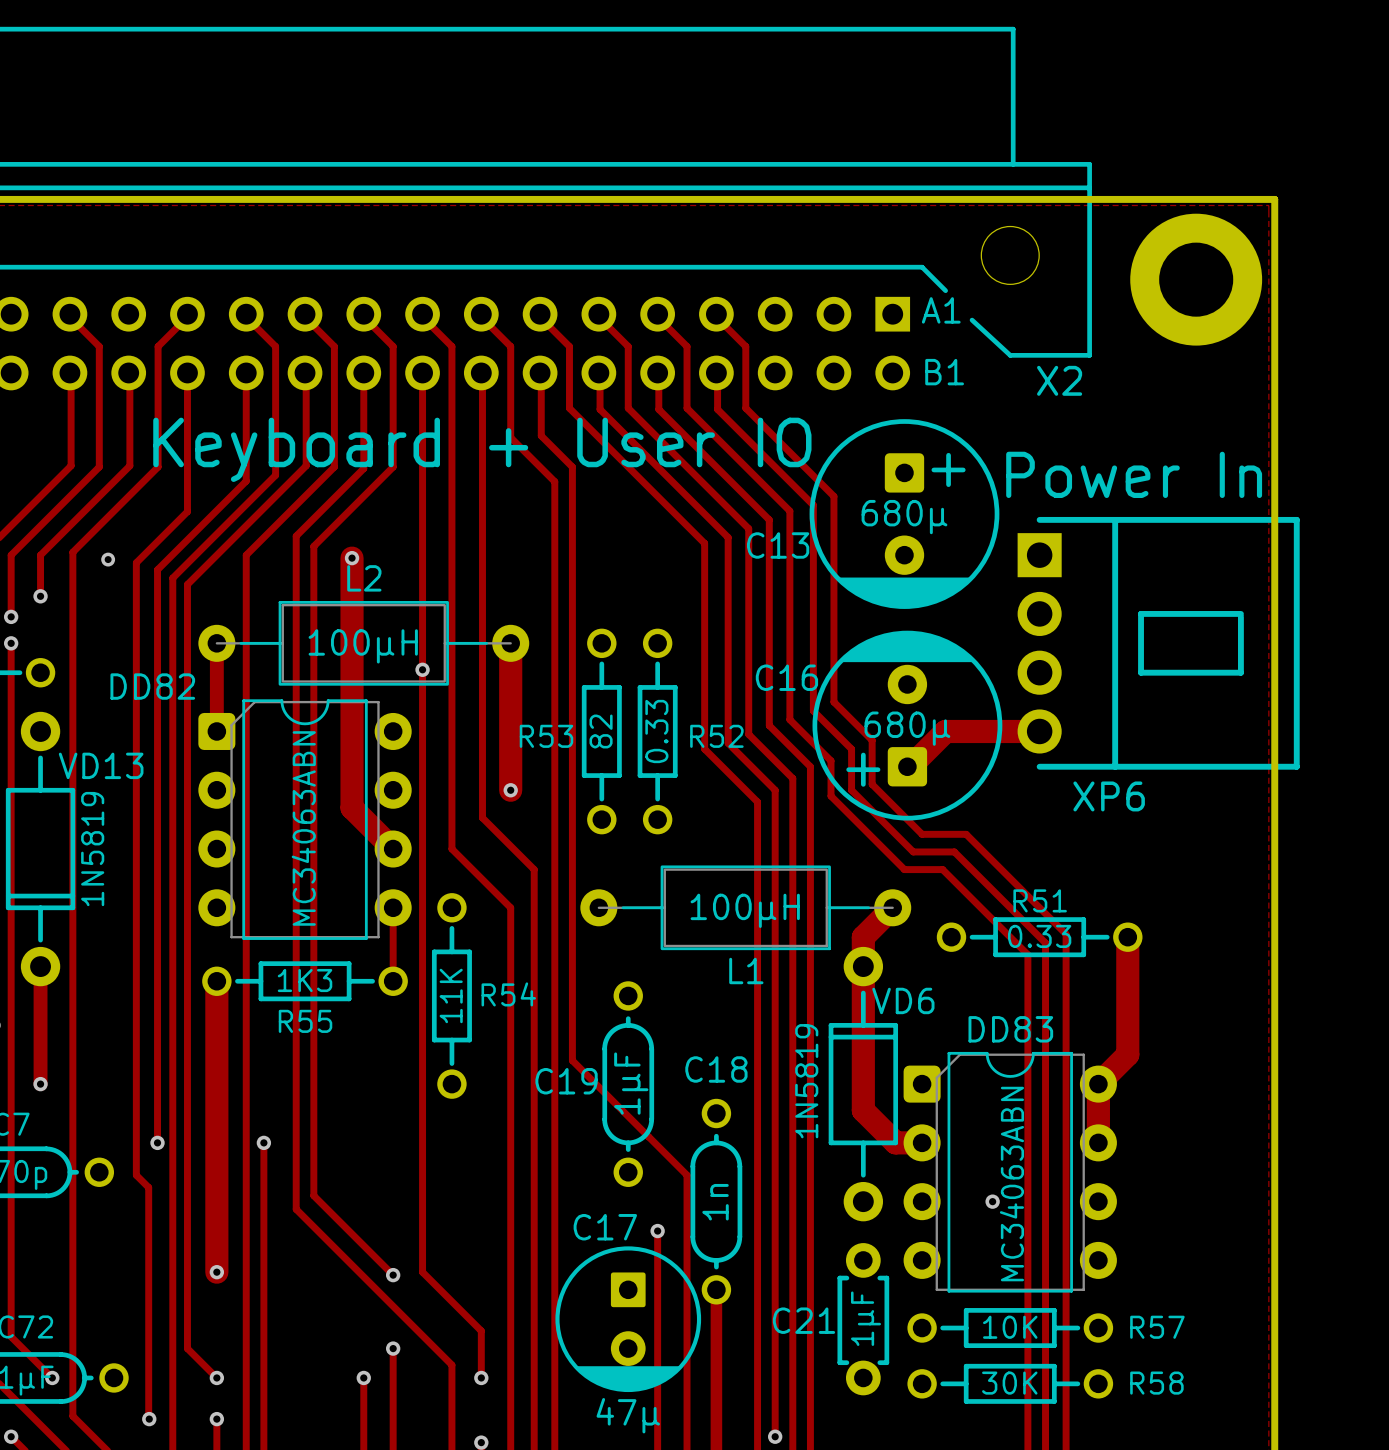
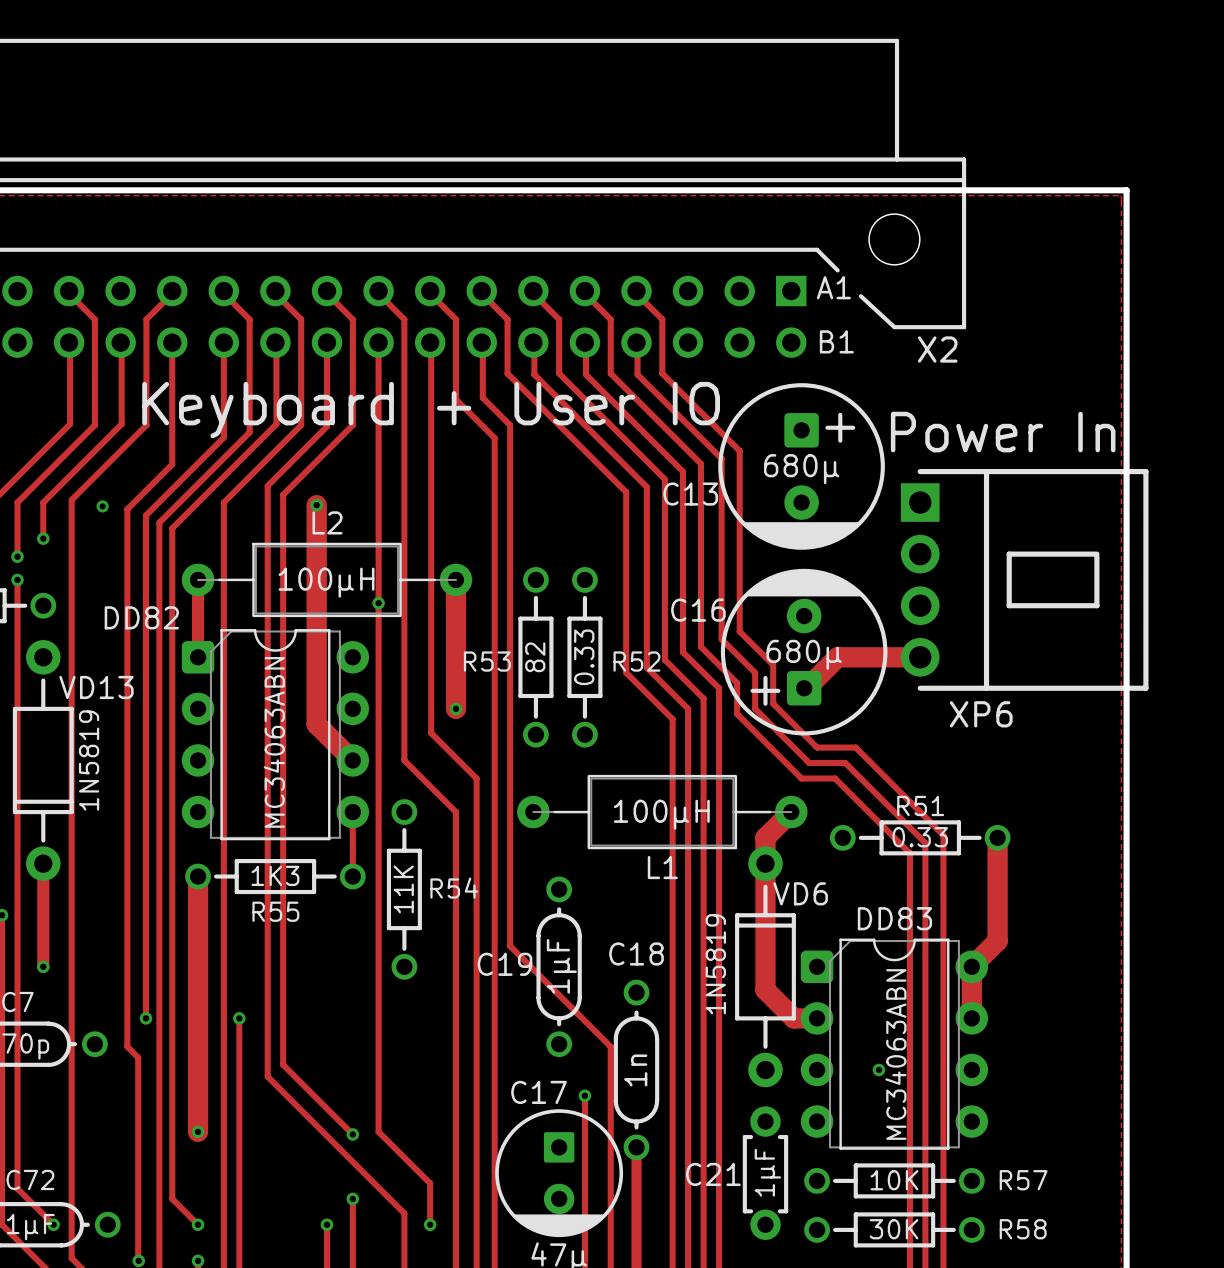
part: (1196, 279) -> none

